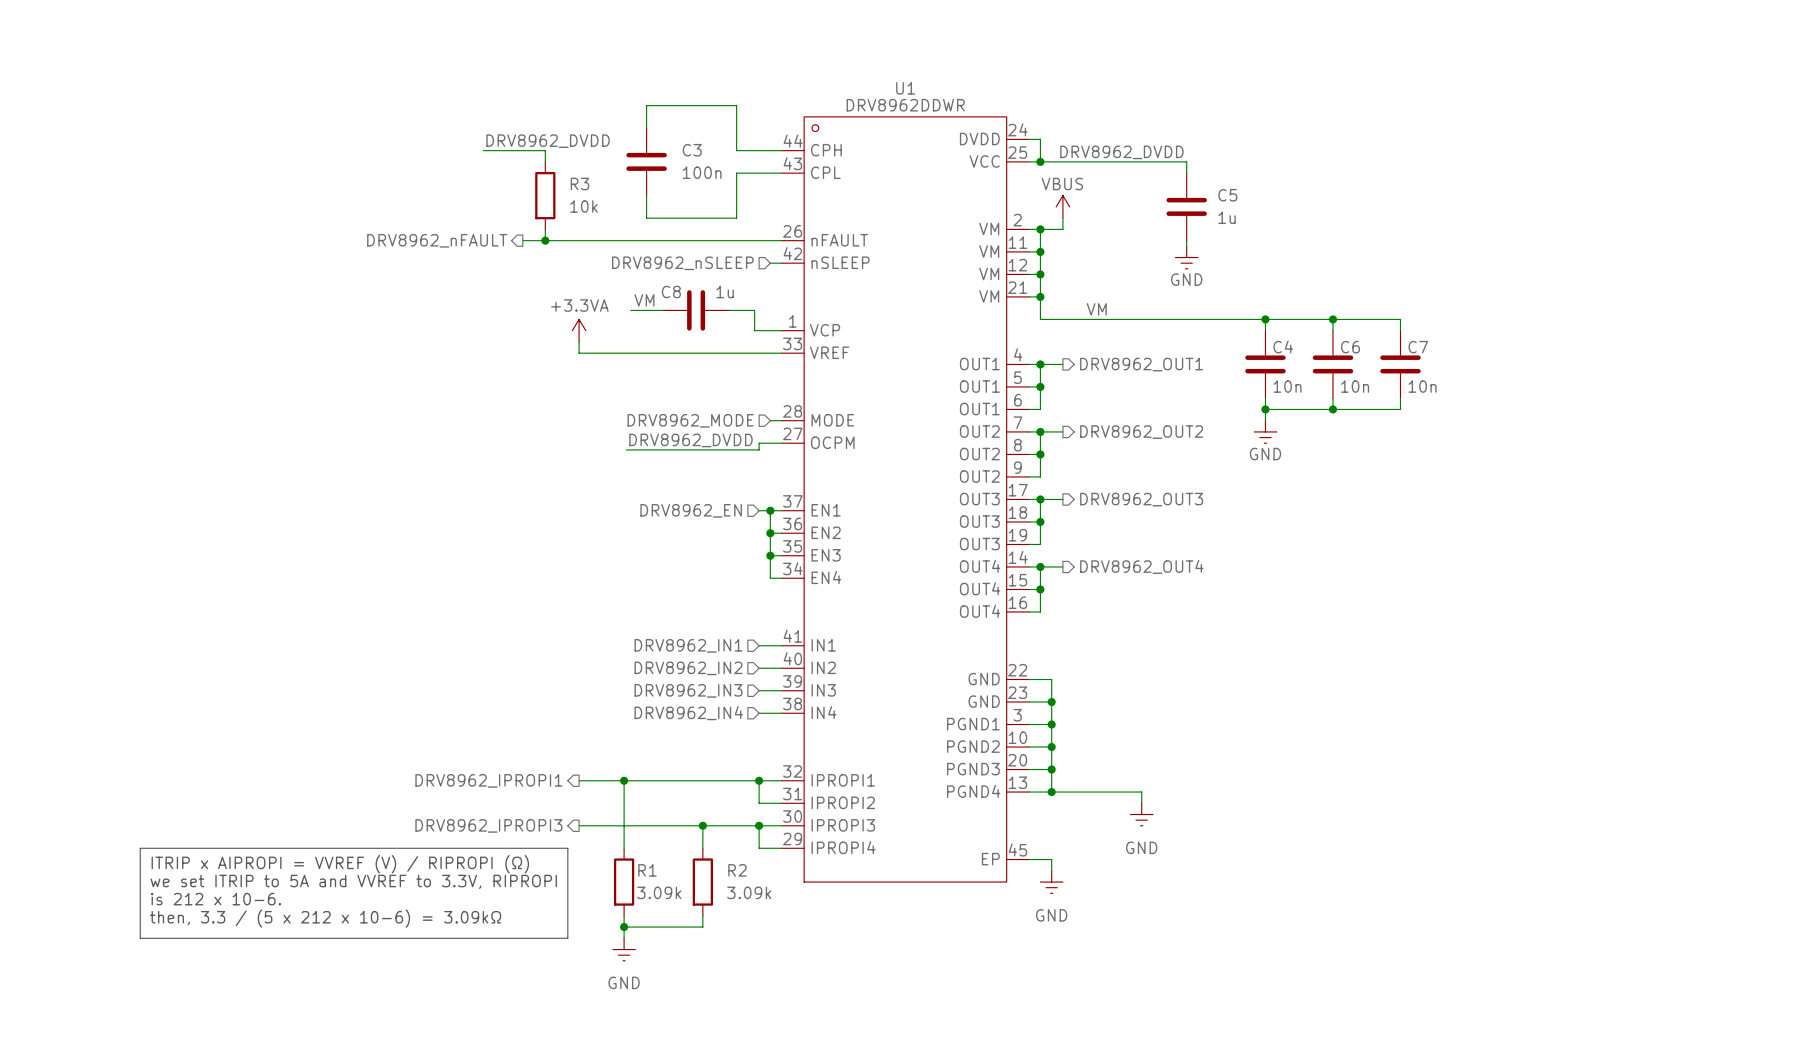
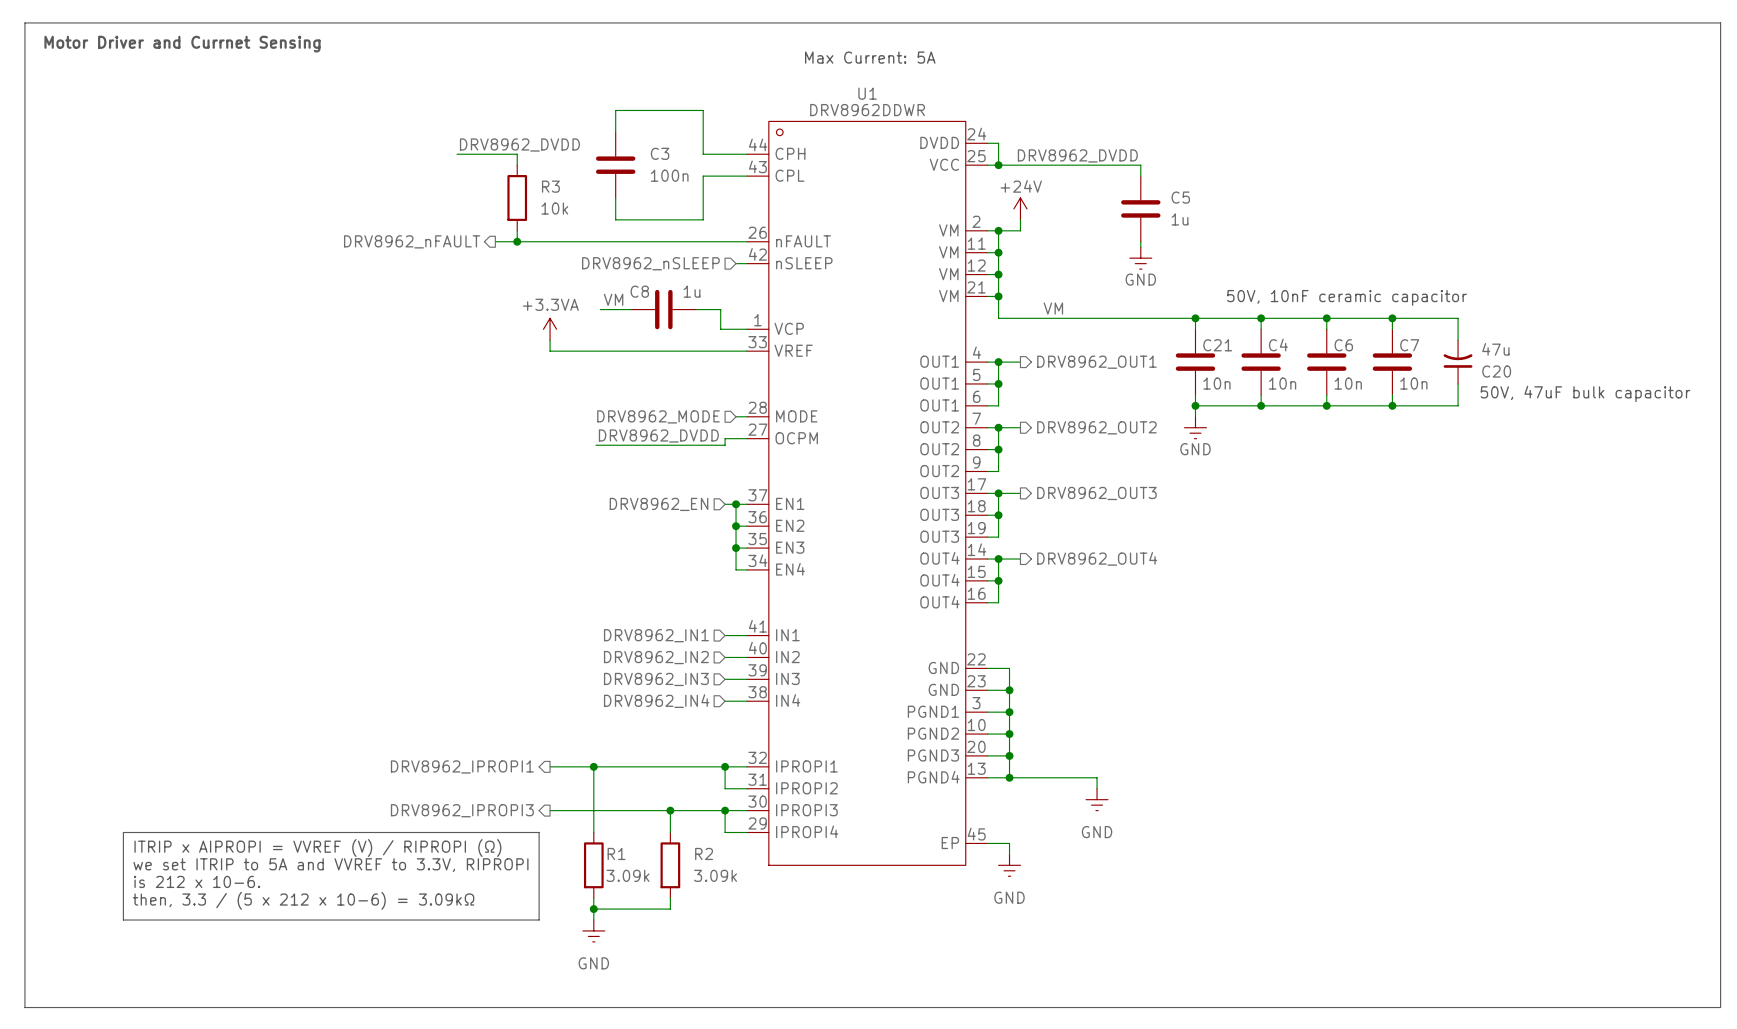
line: none -> (24, 22) (1720, 22) (1720, 1007) (24, 1007) (24, 22)
text: none -> Motor Driver and Currnet Sensing (182, 44)
text: none -> Max Current: 5A (870, 57)
power symbol: VBUS (1062, 206) -> +24V (1020, 208)
text: none -> 50V, 10nF ceramic capacitor (1346, 297)
junction: none -> (1195, 318)
wire: (1265, 319) (1265, 330) -> (1195, 318) (1195, 329)
junction: (1265, 319) -> none
junction: none -> (1261, 318)
wire: (1332, 319) (1332, 330) -> (1261, 318) (1261, 329)
junction: (1332, 319) -> none
wire: none -> (1326, 318) (1326, 329)
junction: none -> (1326, 318)
wire: (1400, 319) (1400, 330) -> (1348, 318) (1458, 318) (1458, 340)
wire: none -> (1392, 318) (1392, 329)
junction: none -> (1392, 318)
C21: none -> 10n (1195, 362)
C4 position: (1265, 364) -> (1261, 362)
C6 position: (1332, 364) -> (1326, 362)
C7 position: (1400, 364) -> (1392, 362)
C20: none -> 47u (1458, 362)
text: none -> 50V, 47uF bulk capacitor (1585, 393)
wire: (1265, 398) (1265, 420) -> (1195, 394) (1195, 416)
wire: (1332, 398) (1332, 409) -> (1261, 394) (1261, 405)
wire: none -> (1326, 394) (1326, 405)
wire: (1400, 398) (1400, 409) -> (1458, 383) (1458, 405) (1348, 405)
wire: none -> (1392, 394) (1392, 405)
wire: none -> (1195, 405) (1217, 405)
junction: none -> (1195, 405)
junction: (1265, 409) -> none
junction: none -> (1261, 405)
junction: (1332, 409) -> none
junction: none -> (1326, 405)
junction: none -> (1392, 405)
power symbol position: GND (1265, 431) -> GND (1195, 427)

